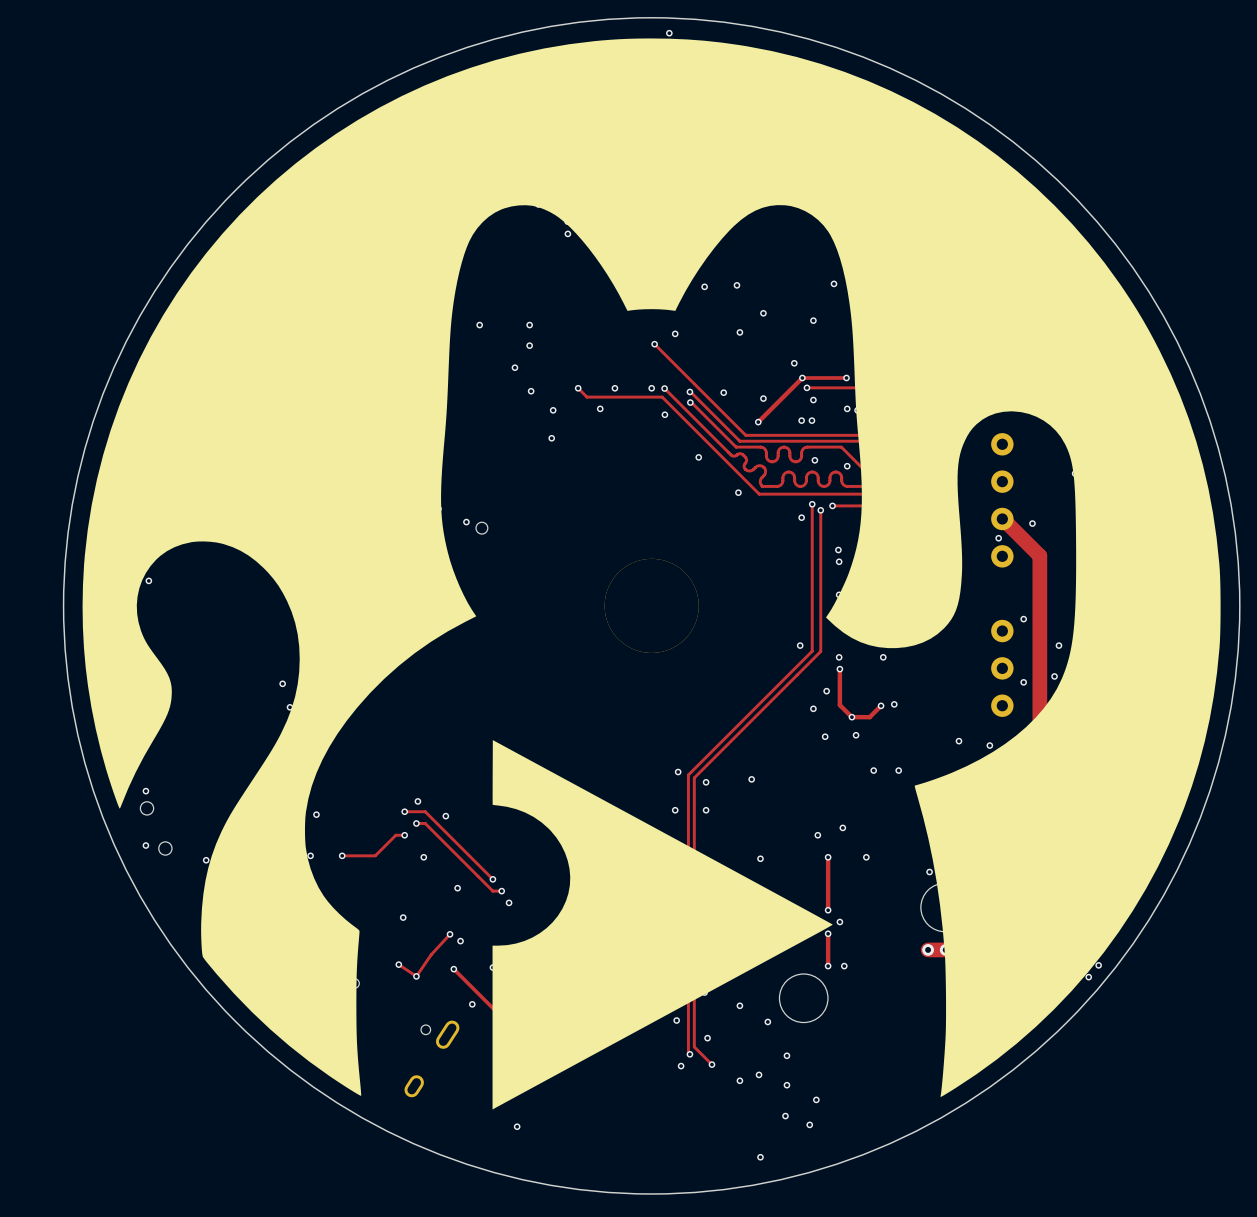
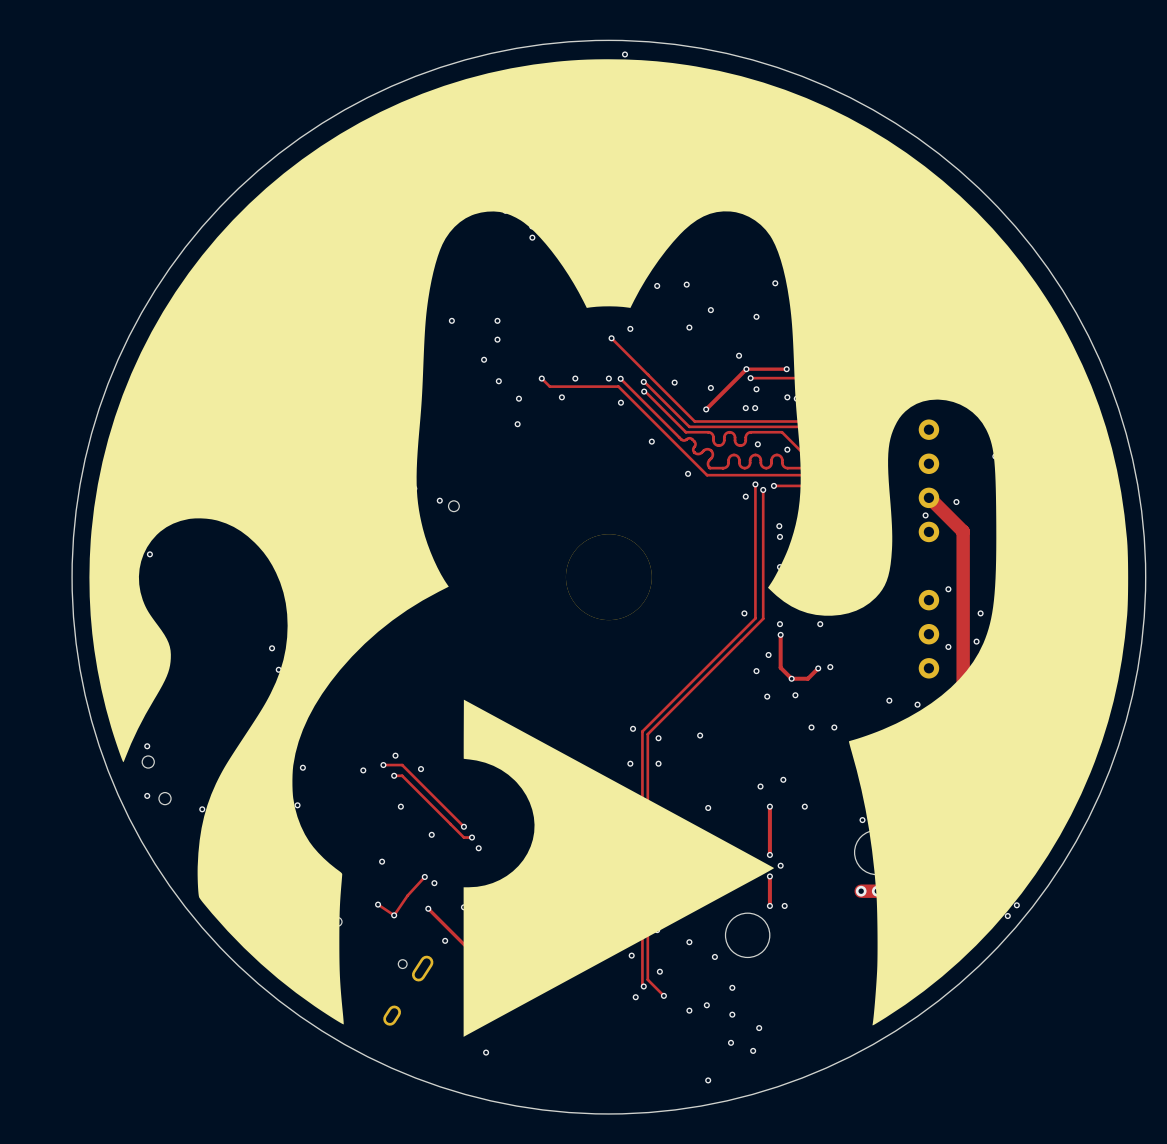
via: none -> (363, 770)
track: (404, 835) (395, 835) (375, 855) (342, 855) -> none
via: (404, 835) -> none
via: (342, 855) -> none

